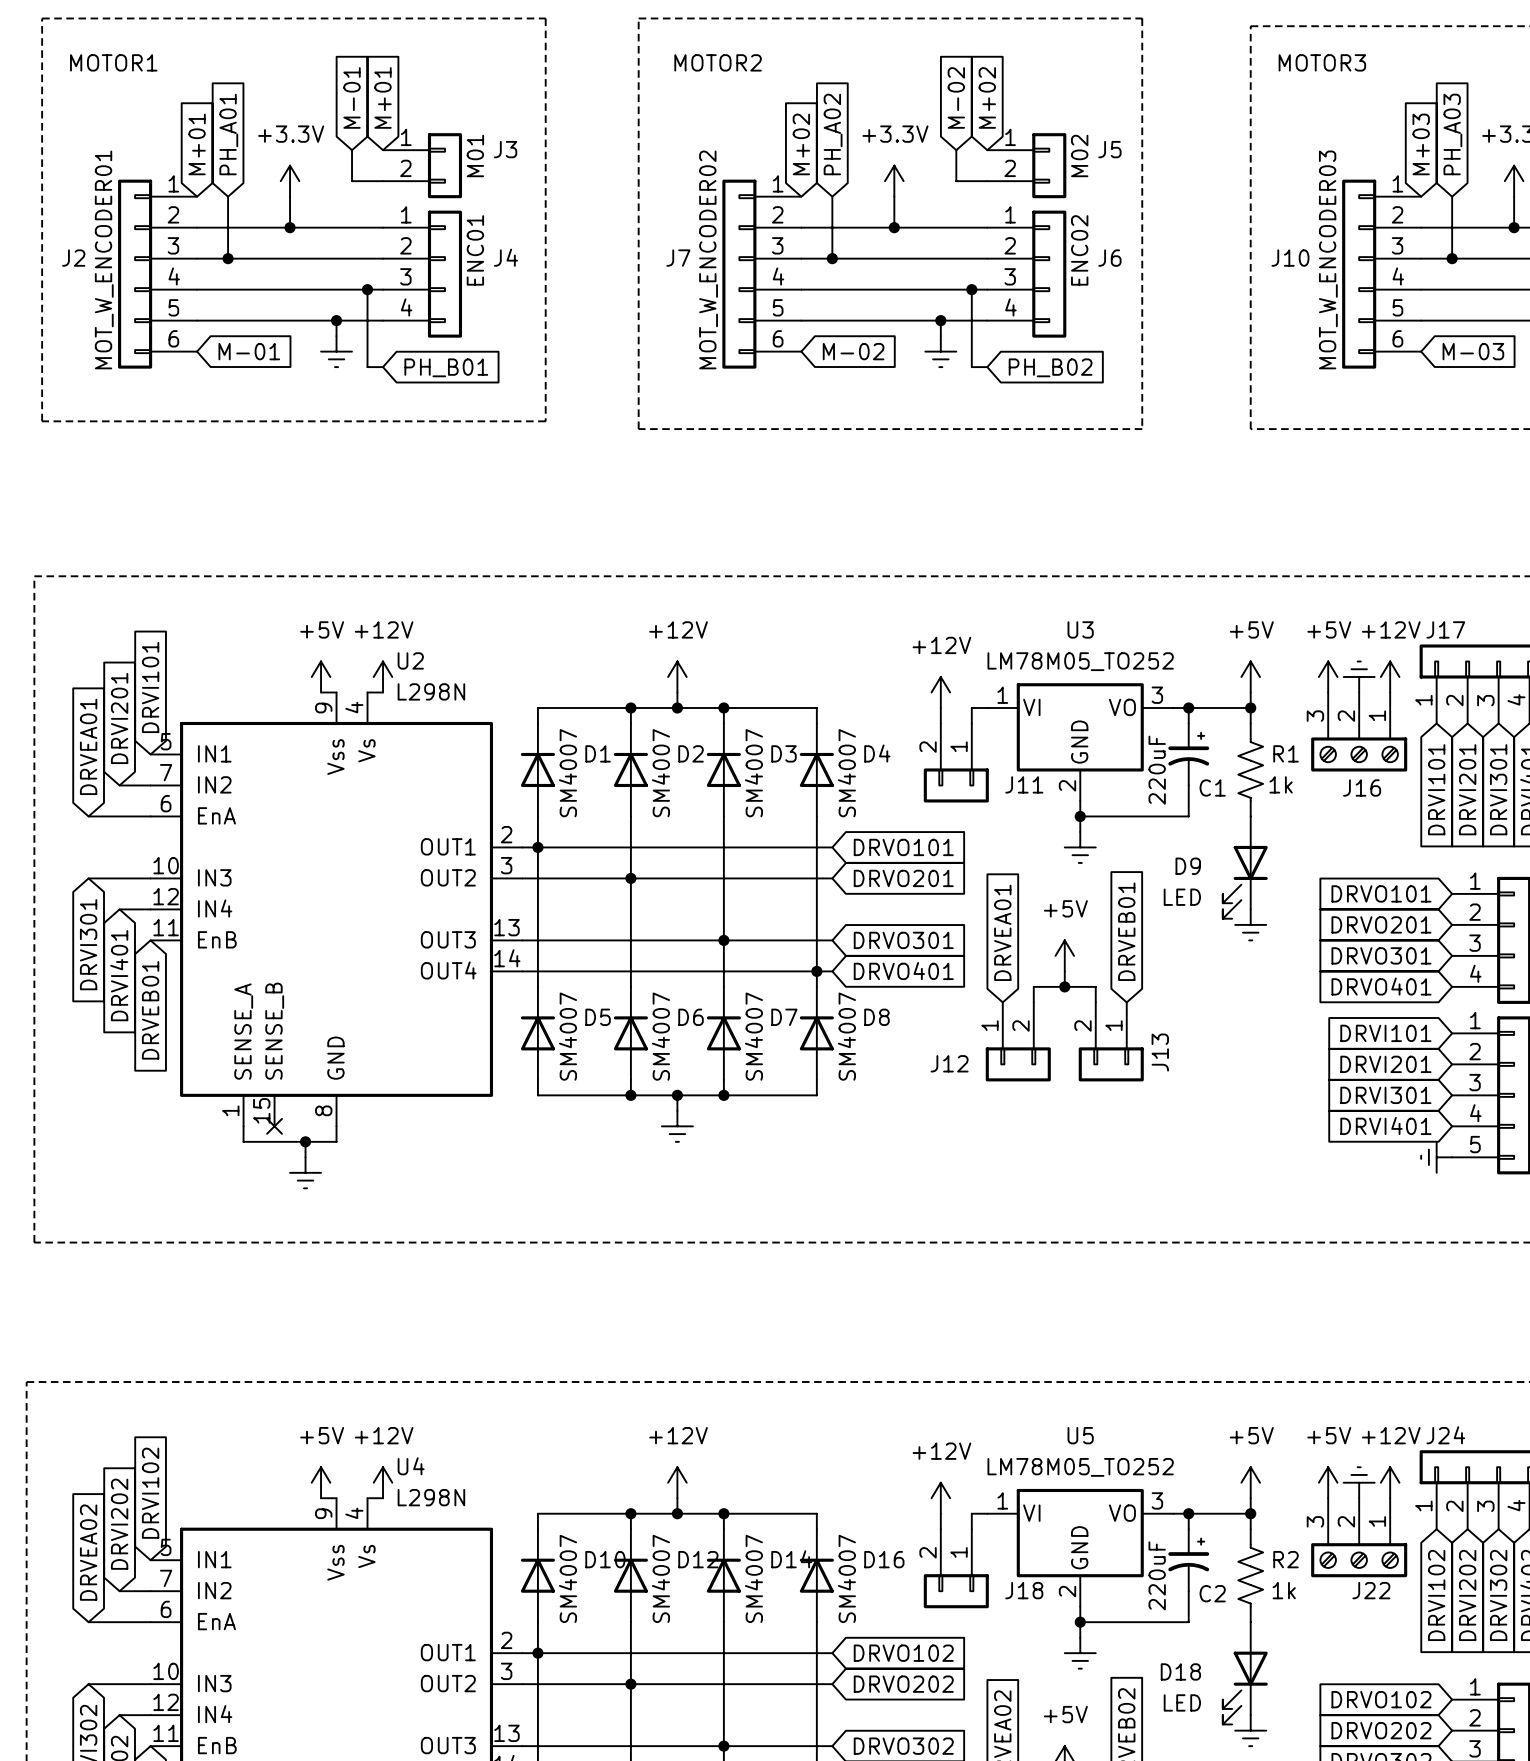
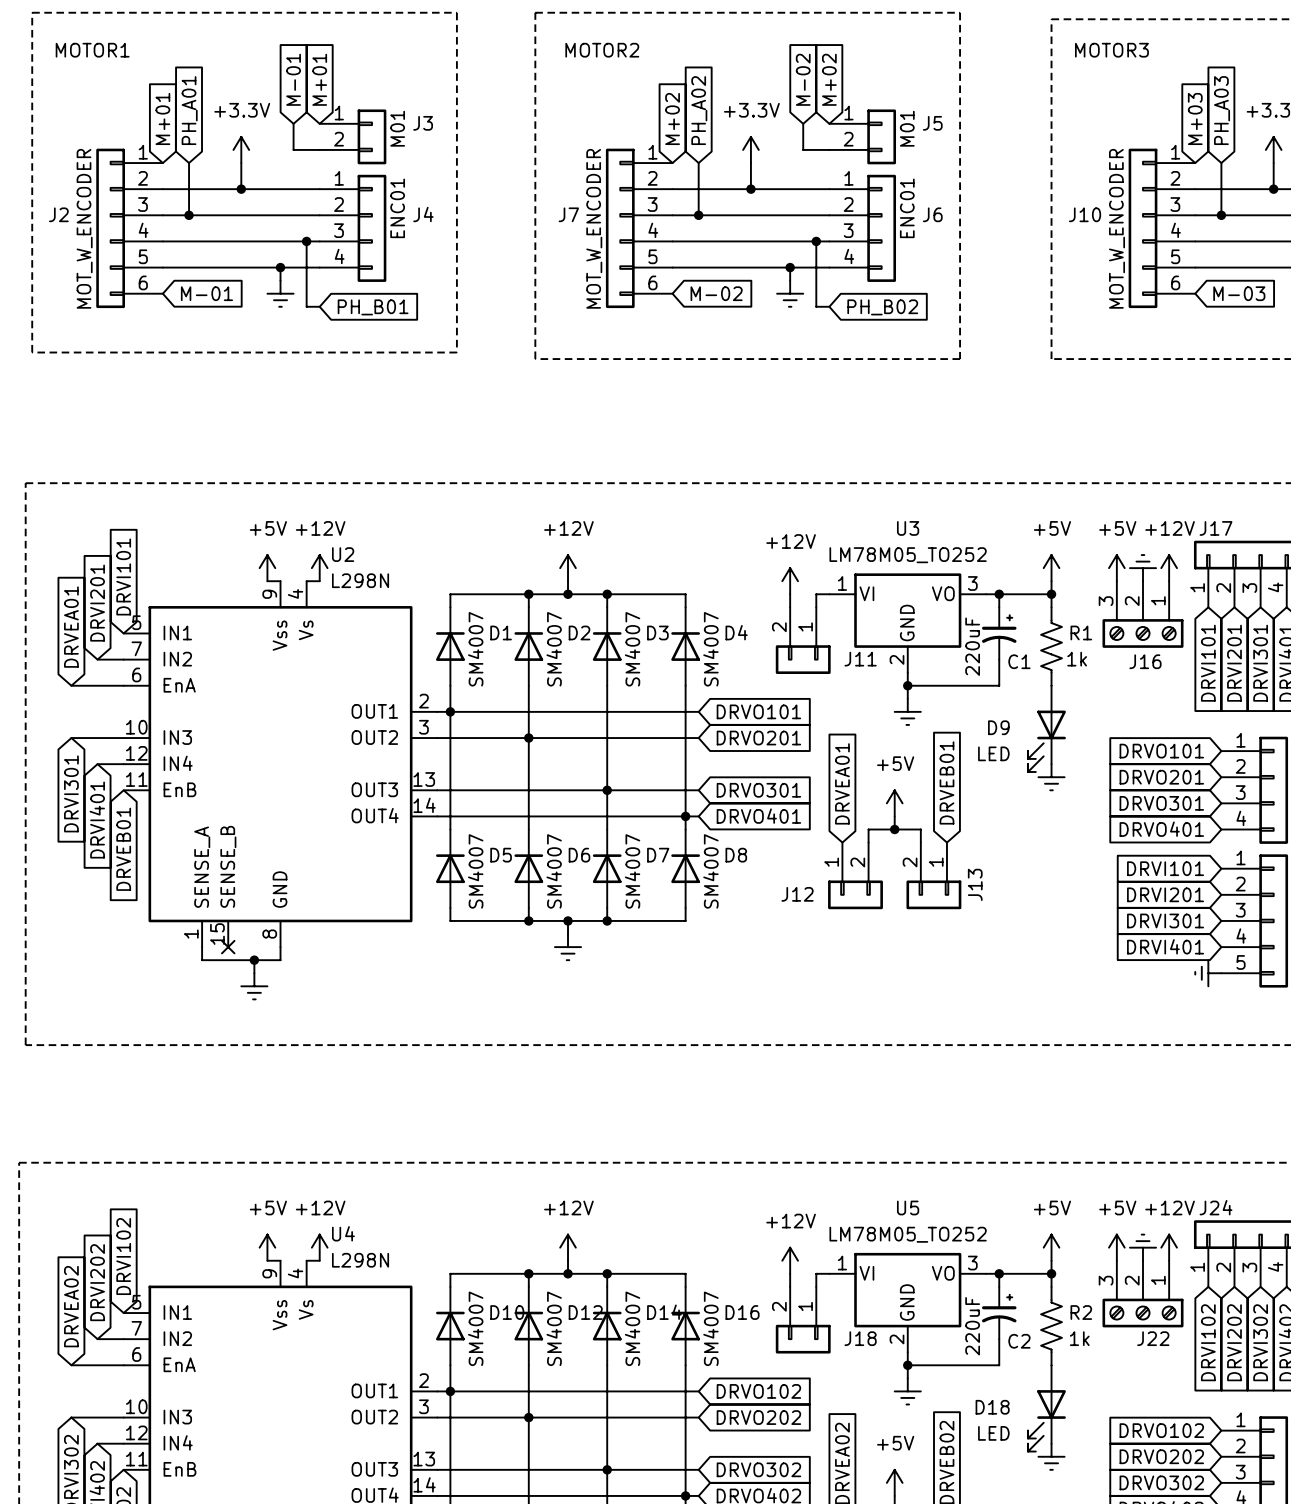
J5 value: M02 (1079, 155) -> M01 (907, 128)
J6 value: ENC02 (1079, 250) -> ENC01 (907, 208)
J2 value: MOT_W_ENCODER01 (104, 259) -> MOT_W_ENCODER (84, 228)
J7 value: MOT_W_ENCODER02 (708, 259) -> MOT_W_ENCODER (594, 228)
J10 value: MOT_W_ENCODER03 (1328, 259) -> MOT_W_ENCODER (1117, 228)

